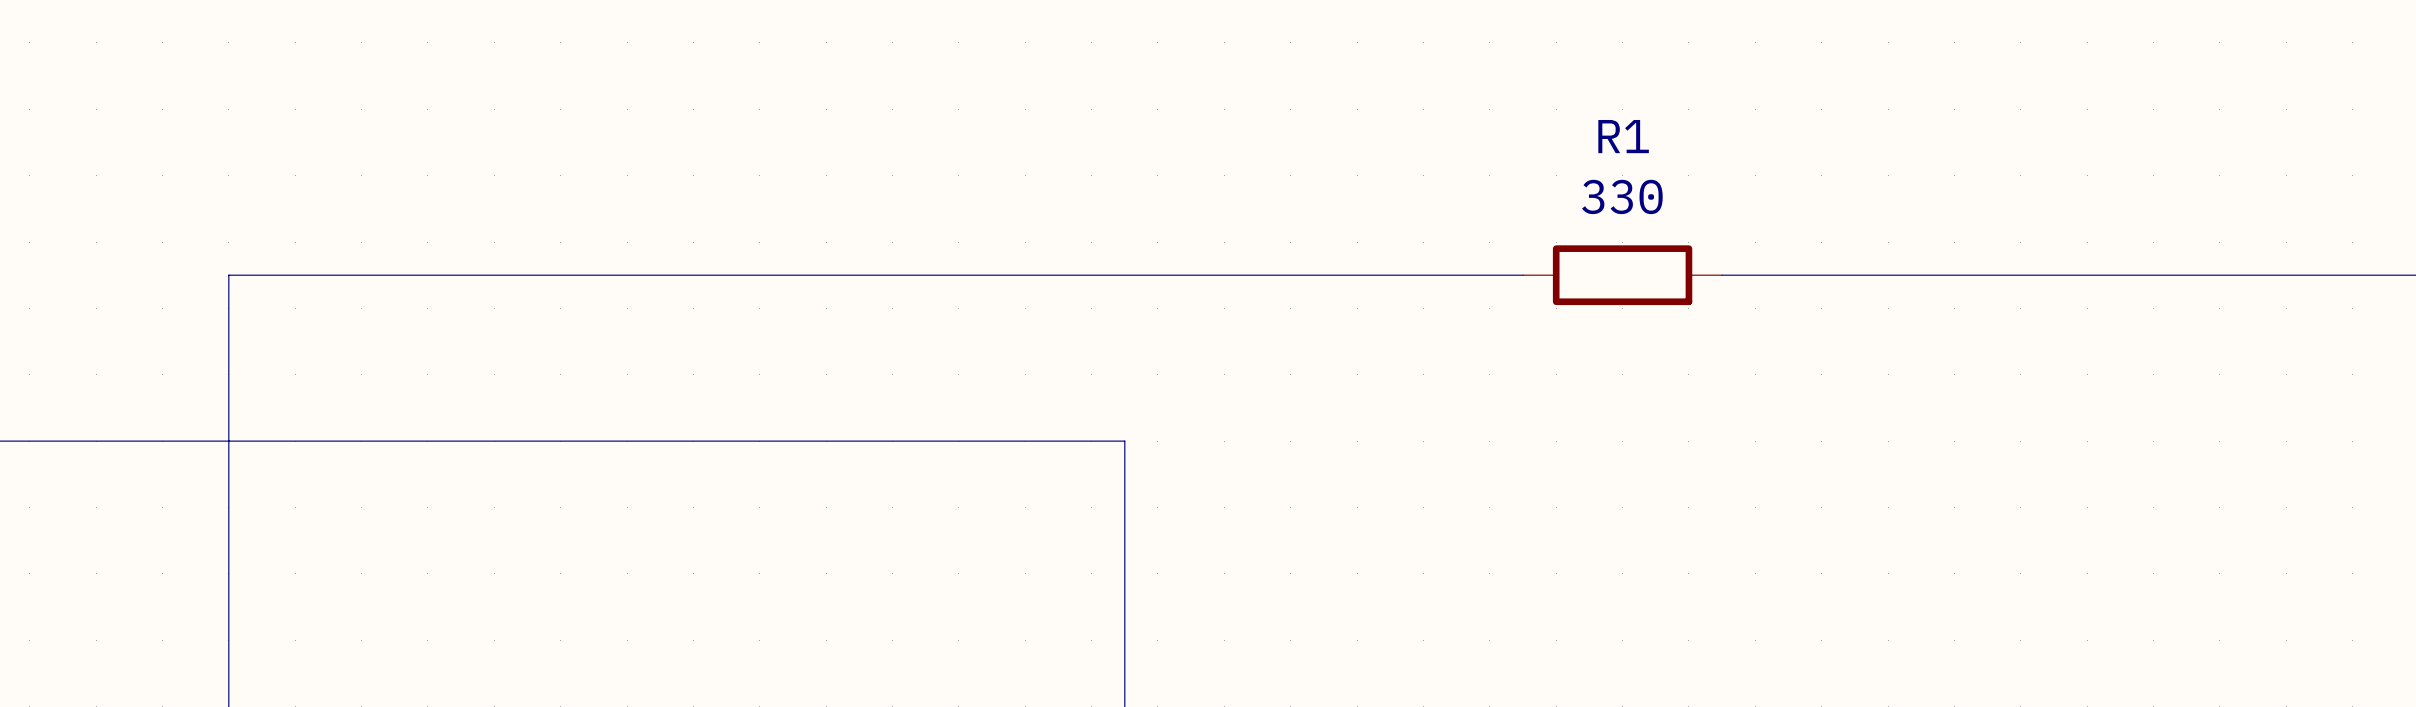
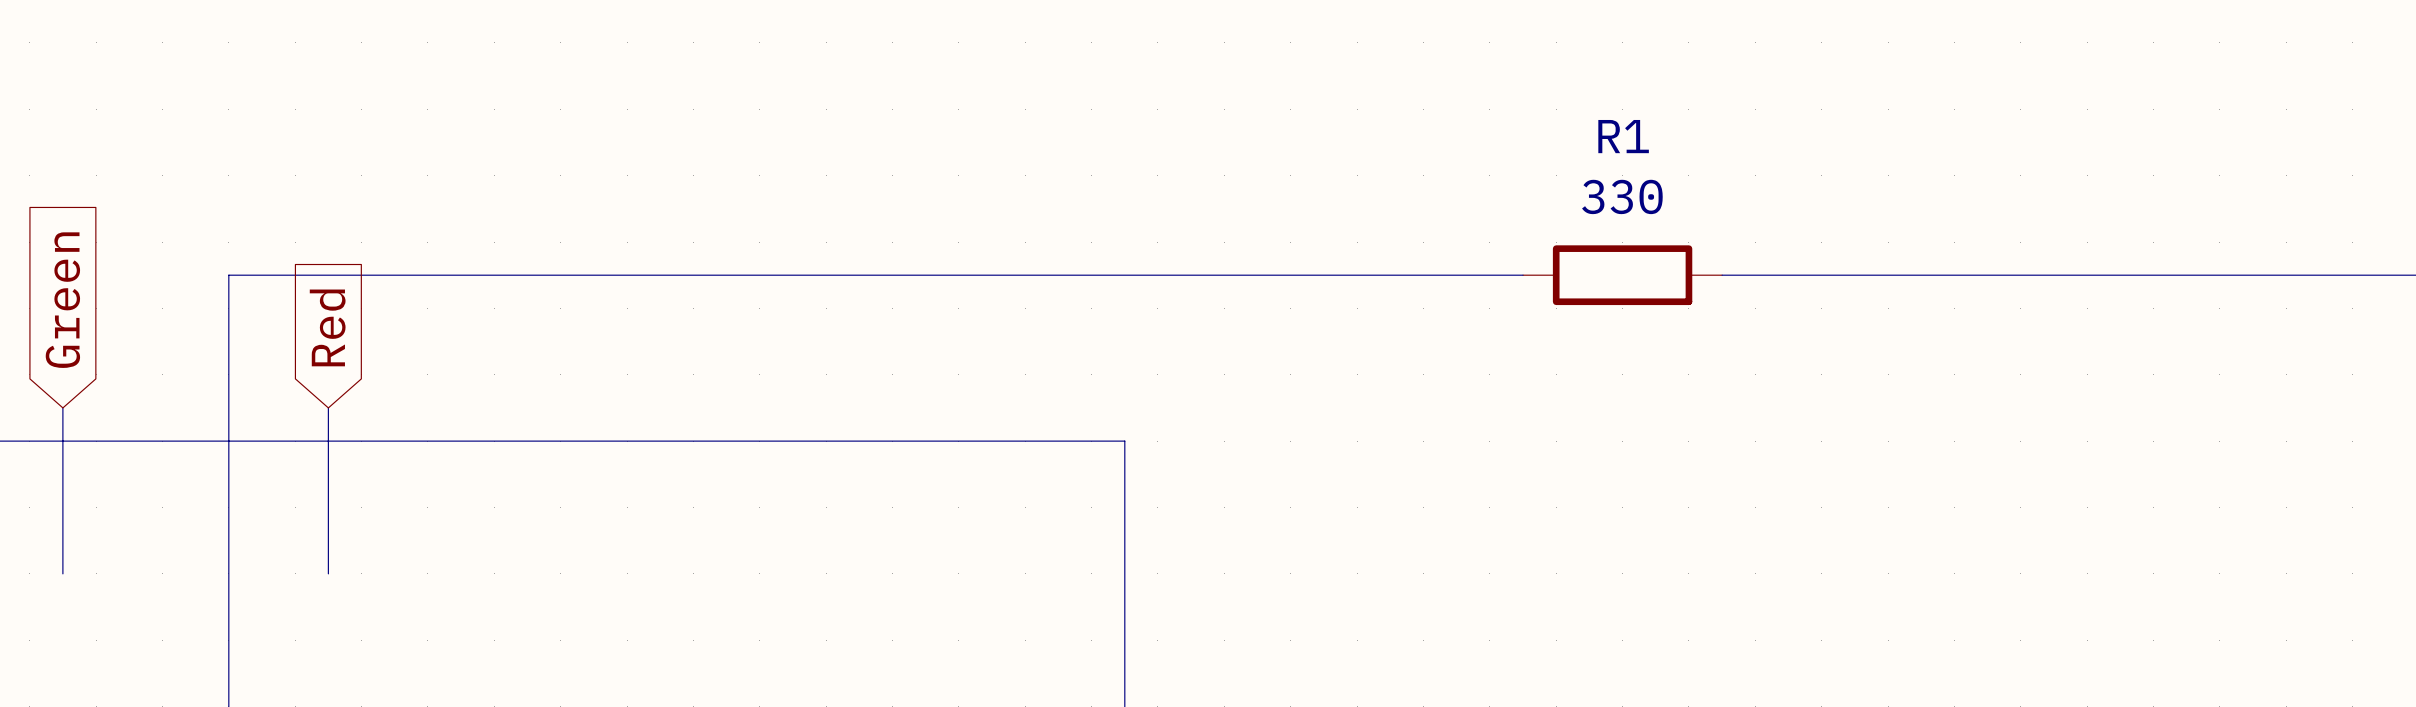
global label: none -> Green (62, 300)
global label: none -> Red (327, 327)
wire: none -> (62, 407) (62, 573)
wire: none -> (328, 407) (328, 573)

